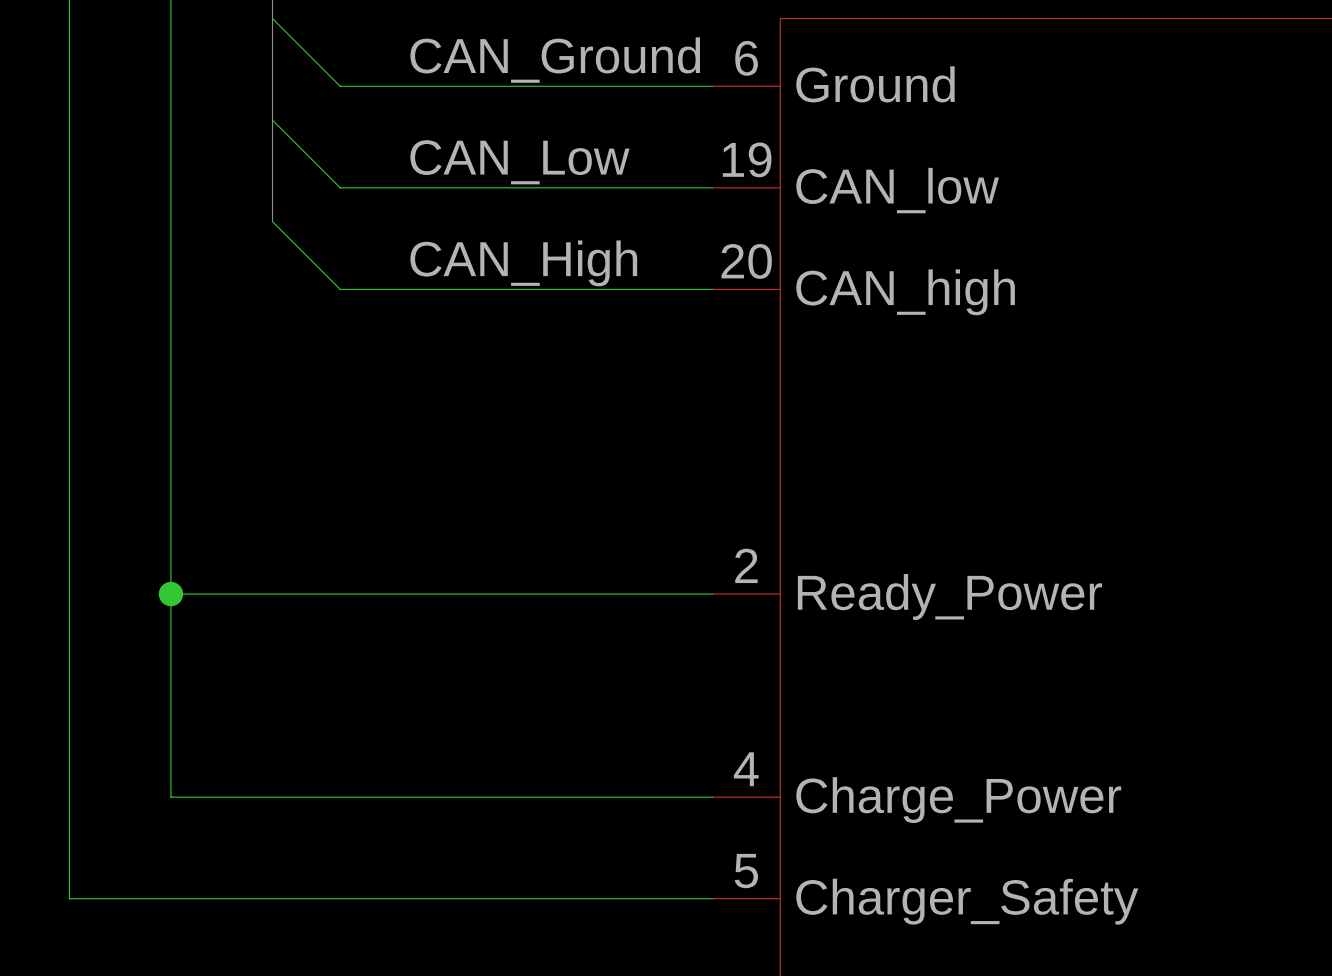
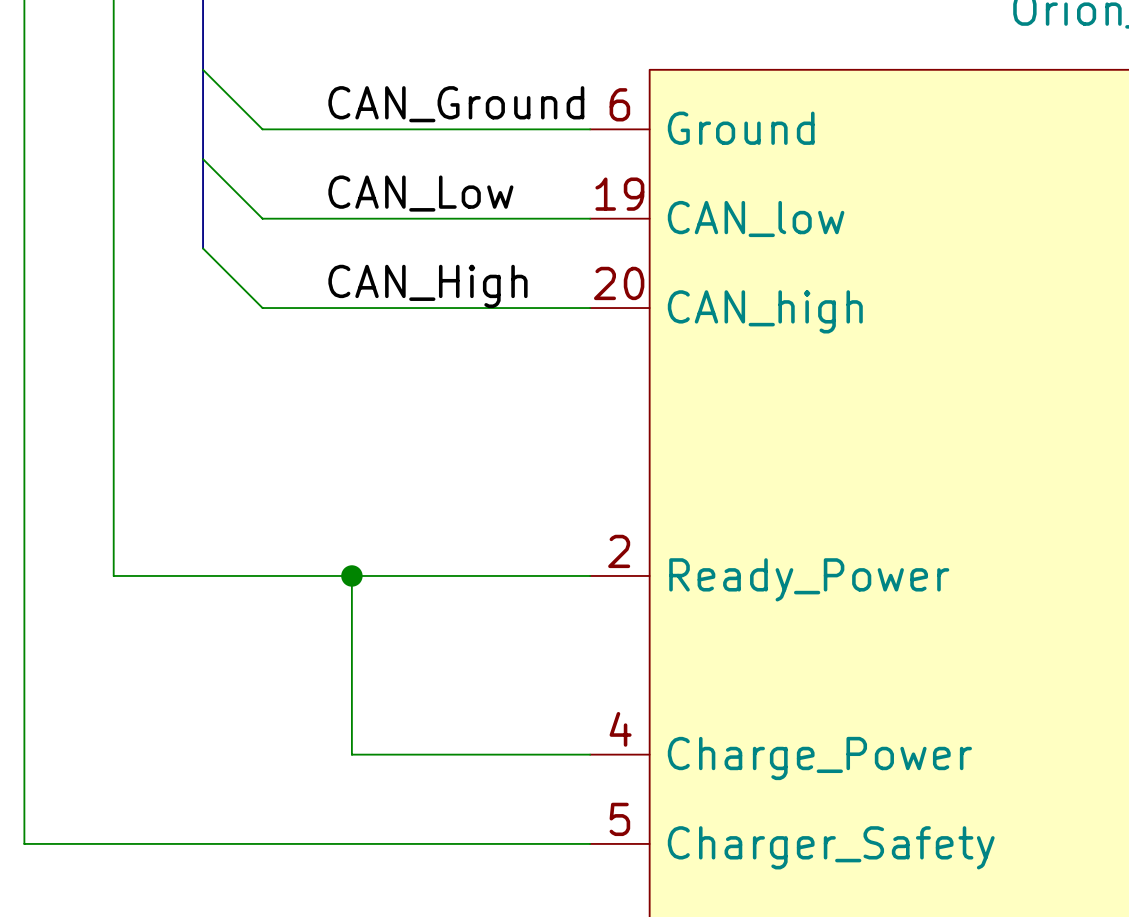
wire: (170, 594) (170, 797) (441, 797) -> (351, 575) (351, 754)
junction: (170, 594) -> none
junction: none -> (351, 575)

